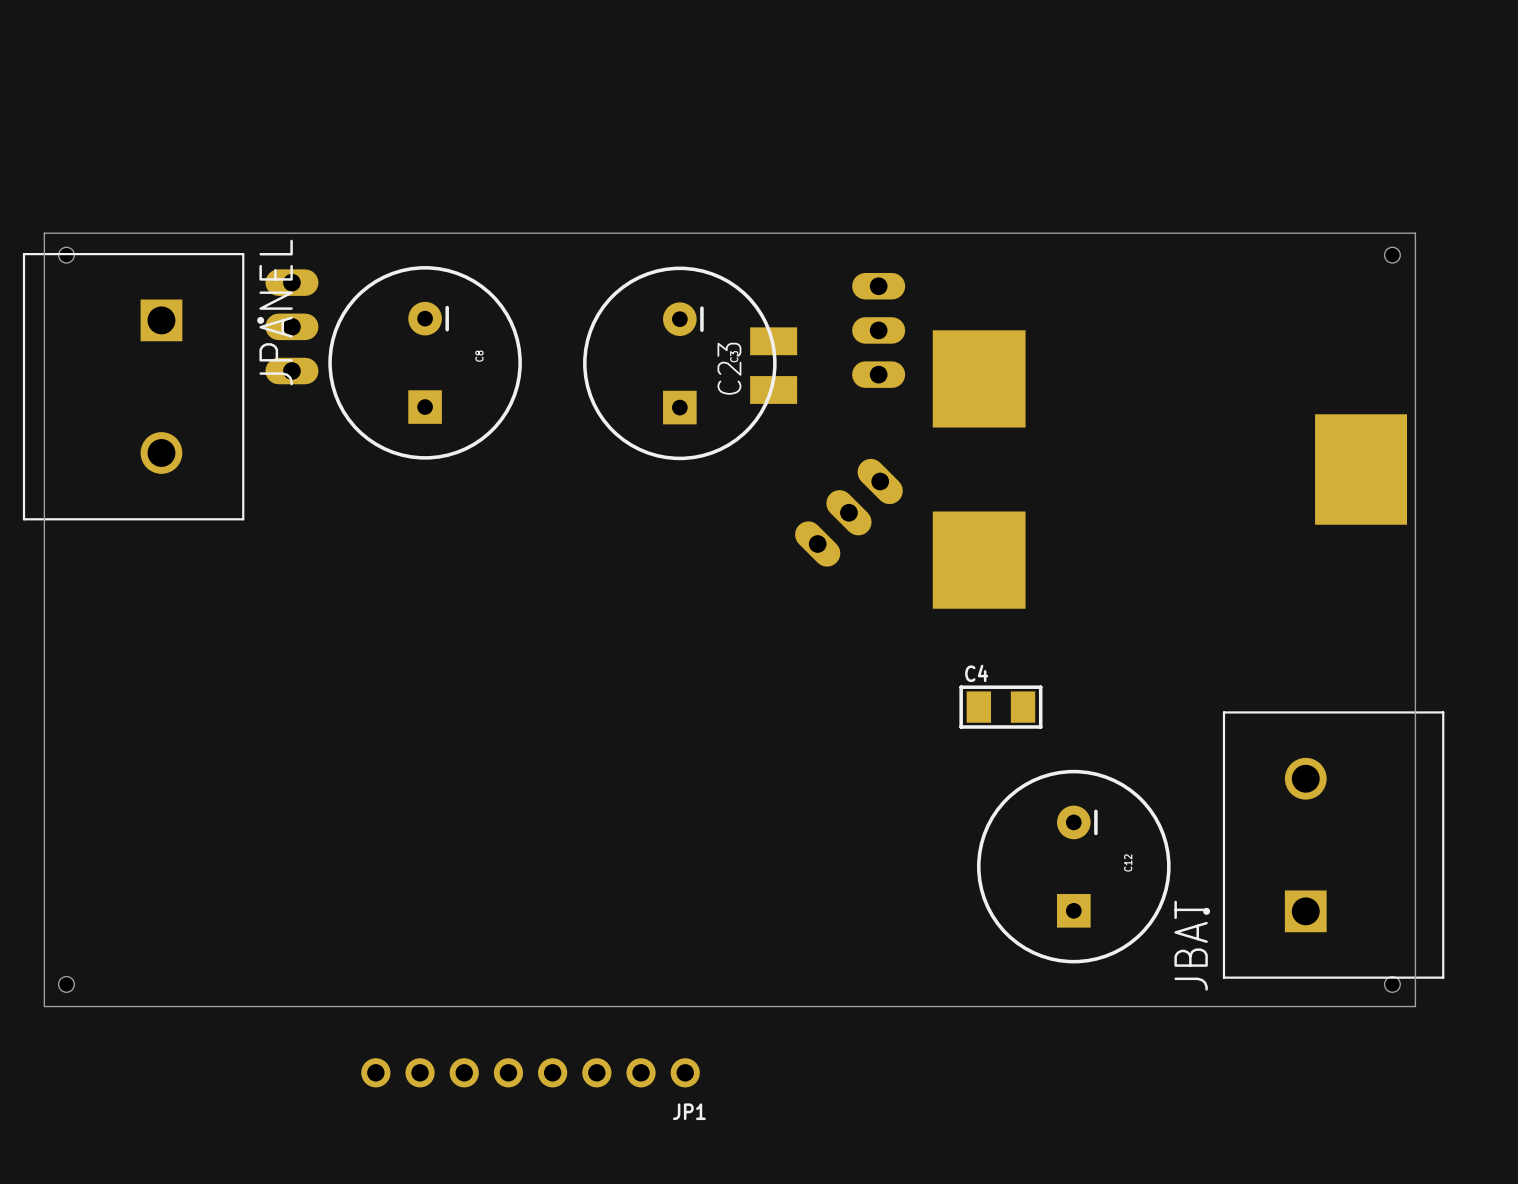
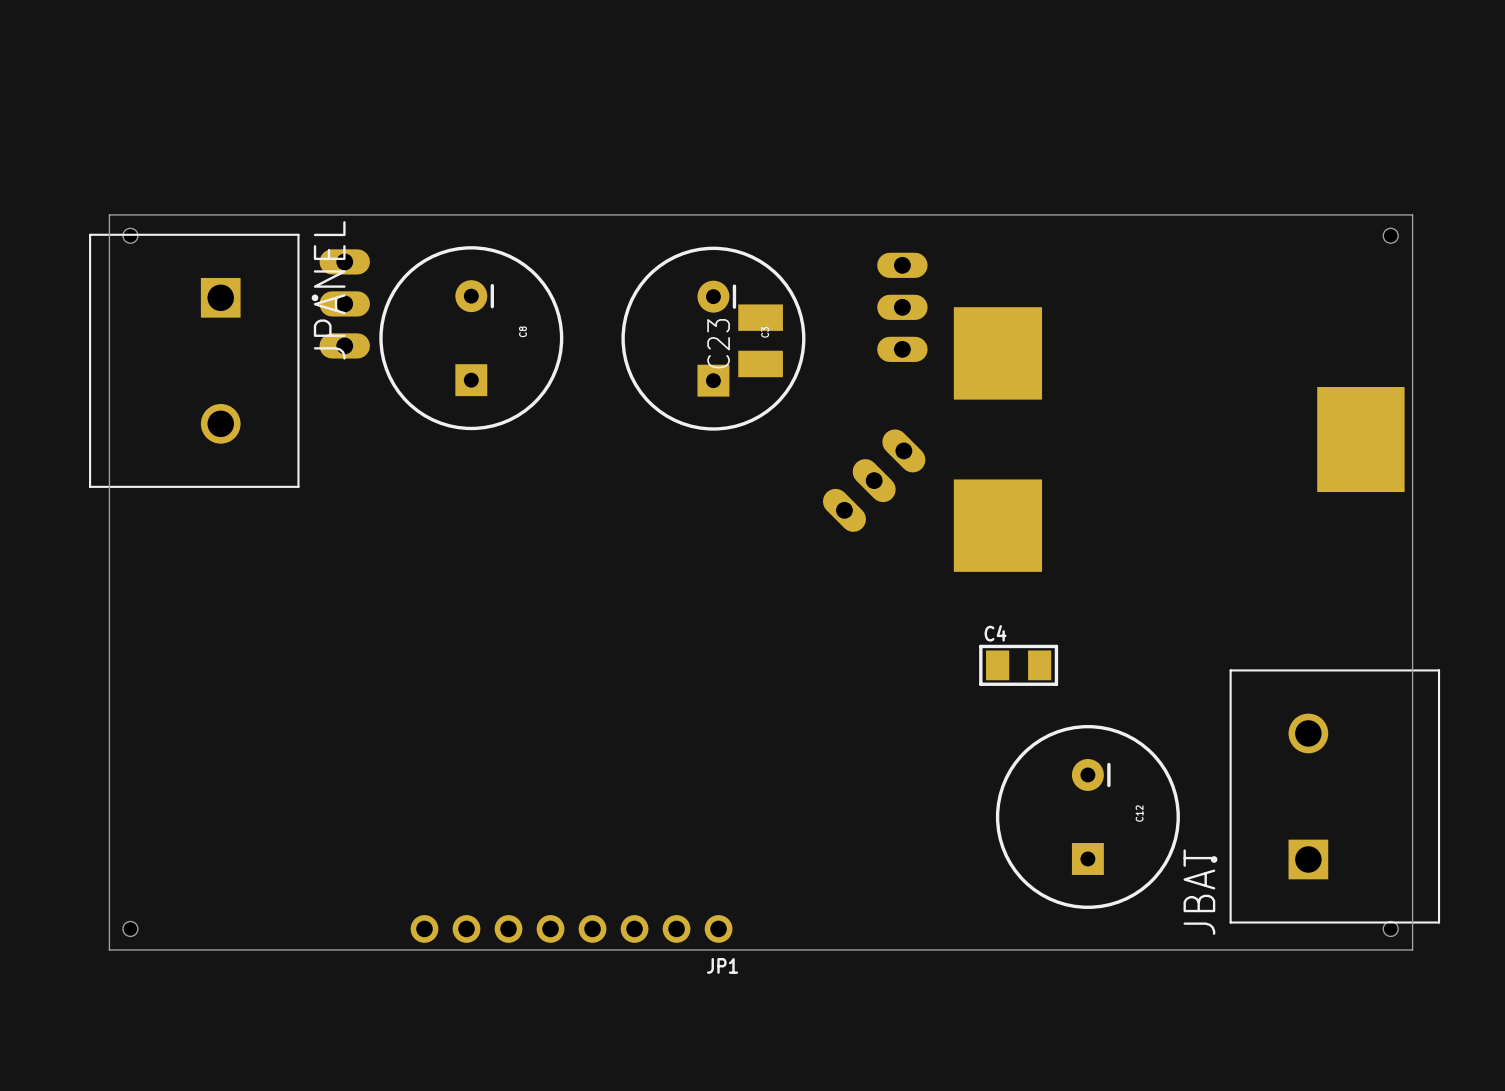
C23 position: (773, 365) -> (760, 340)
JP1 position: (530, 1072) -> (571, 928)

